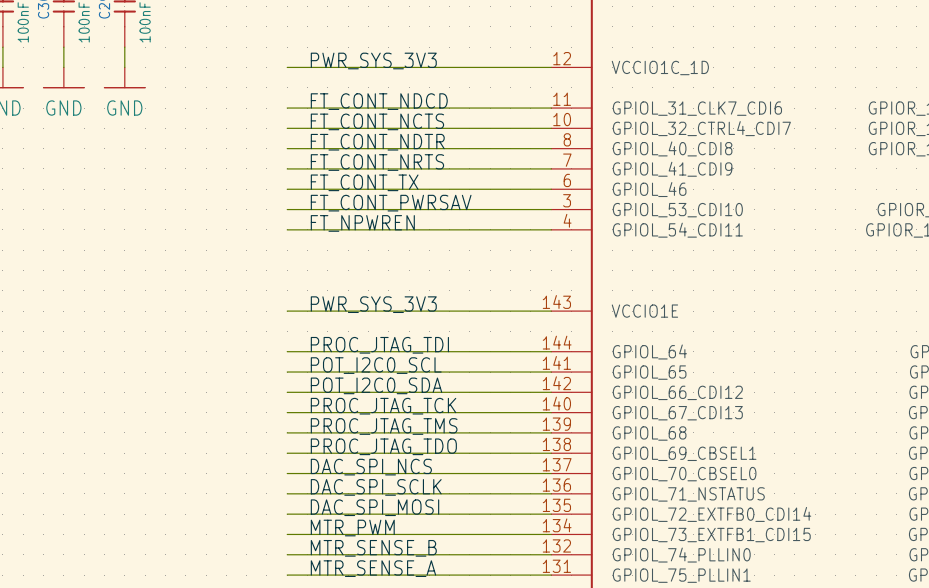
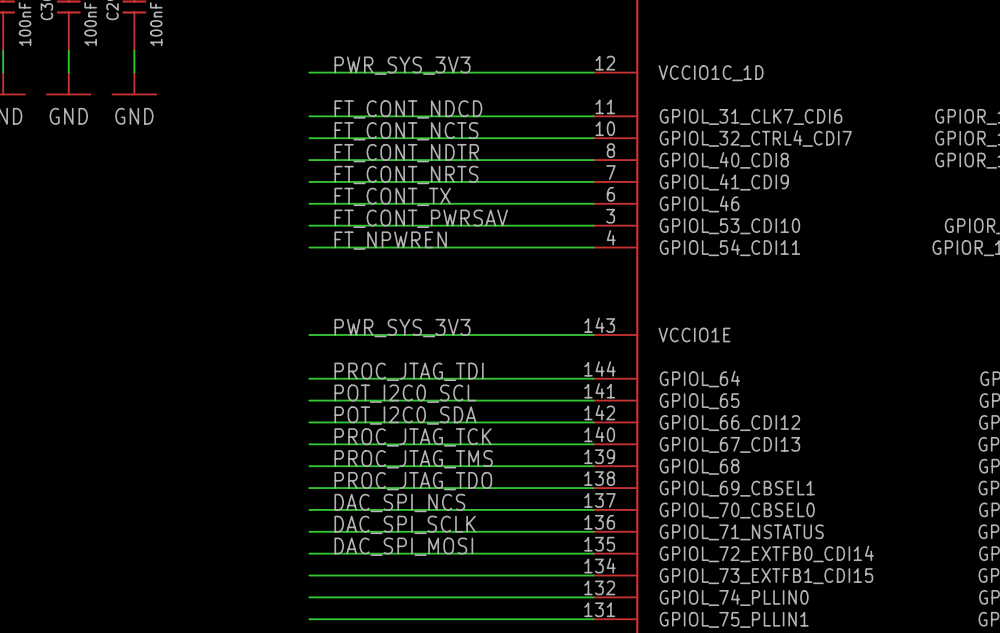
label: MTR_PWM (352, 528) -> none
label: MTR_SENSE_B (373, 548) -> none
label: MTR_SENSE_A (373, 568) -> none

